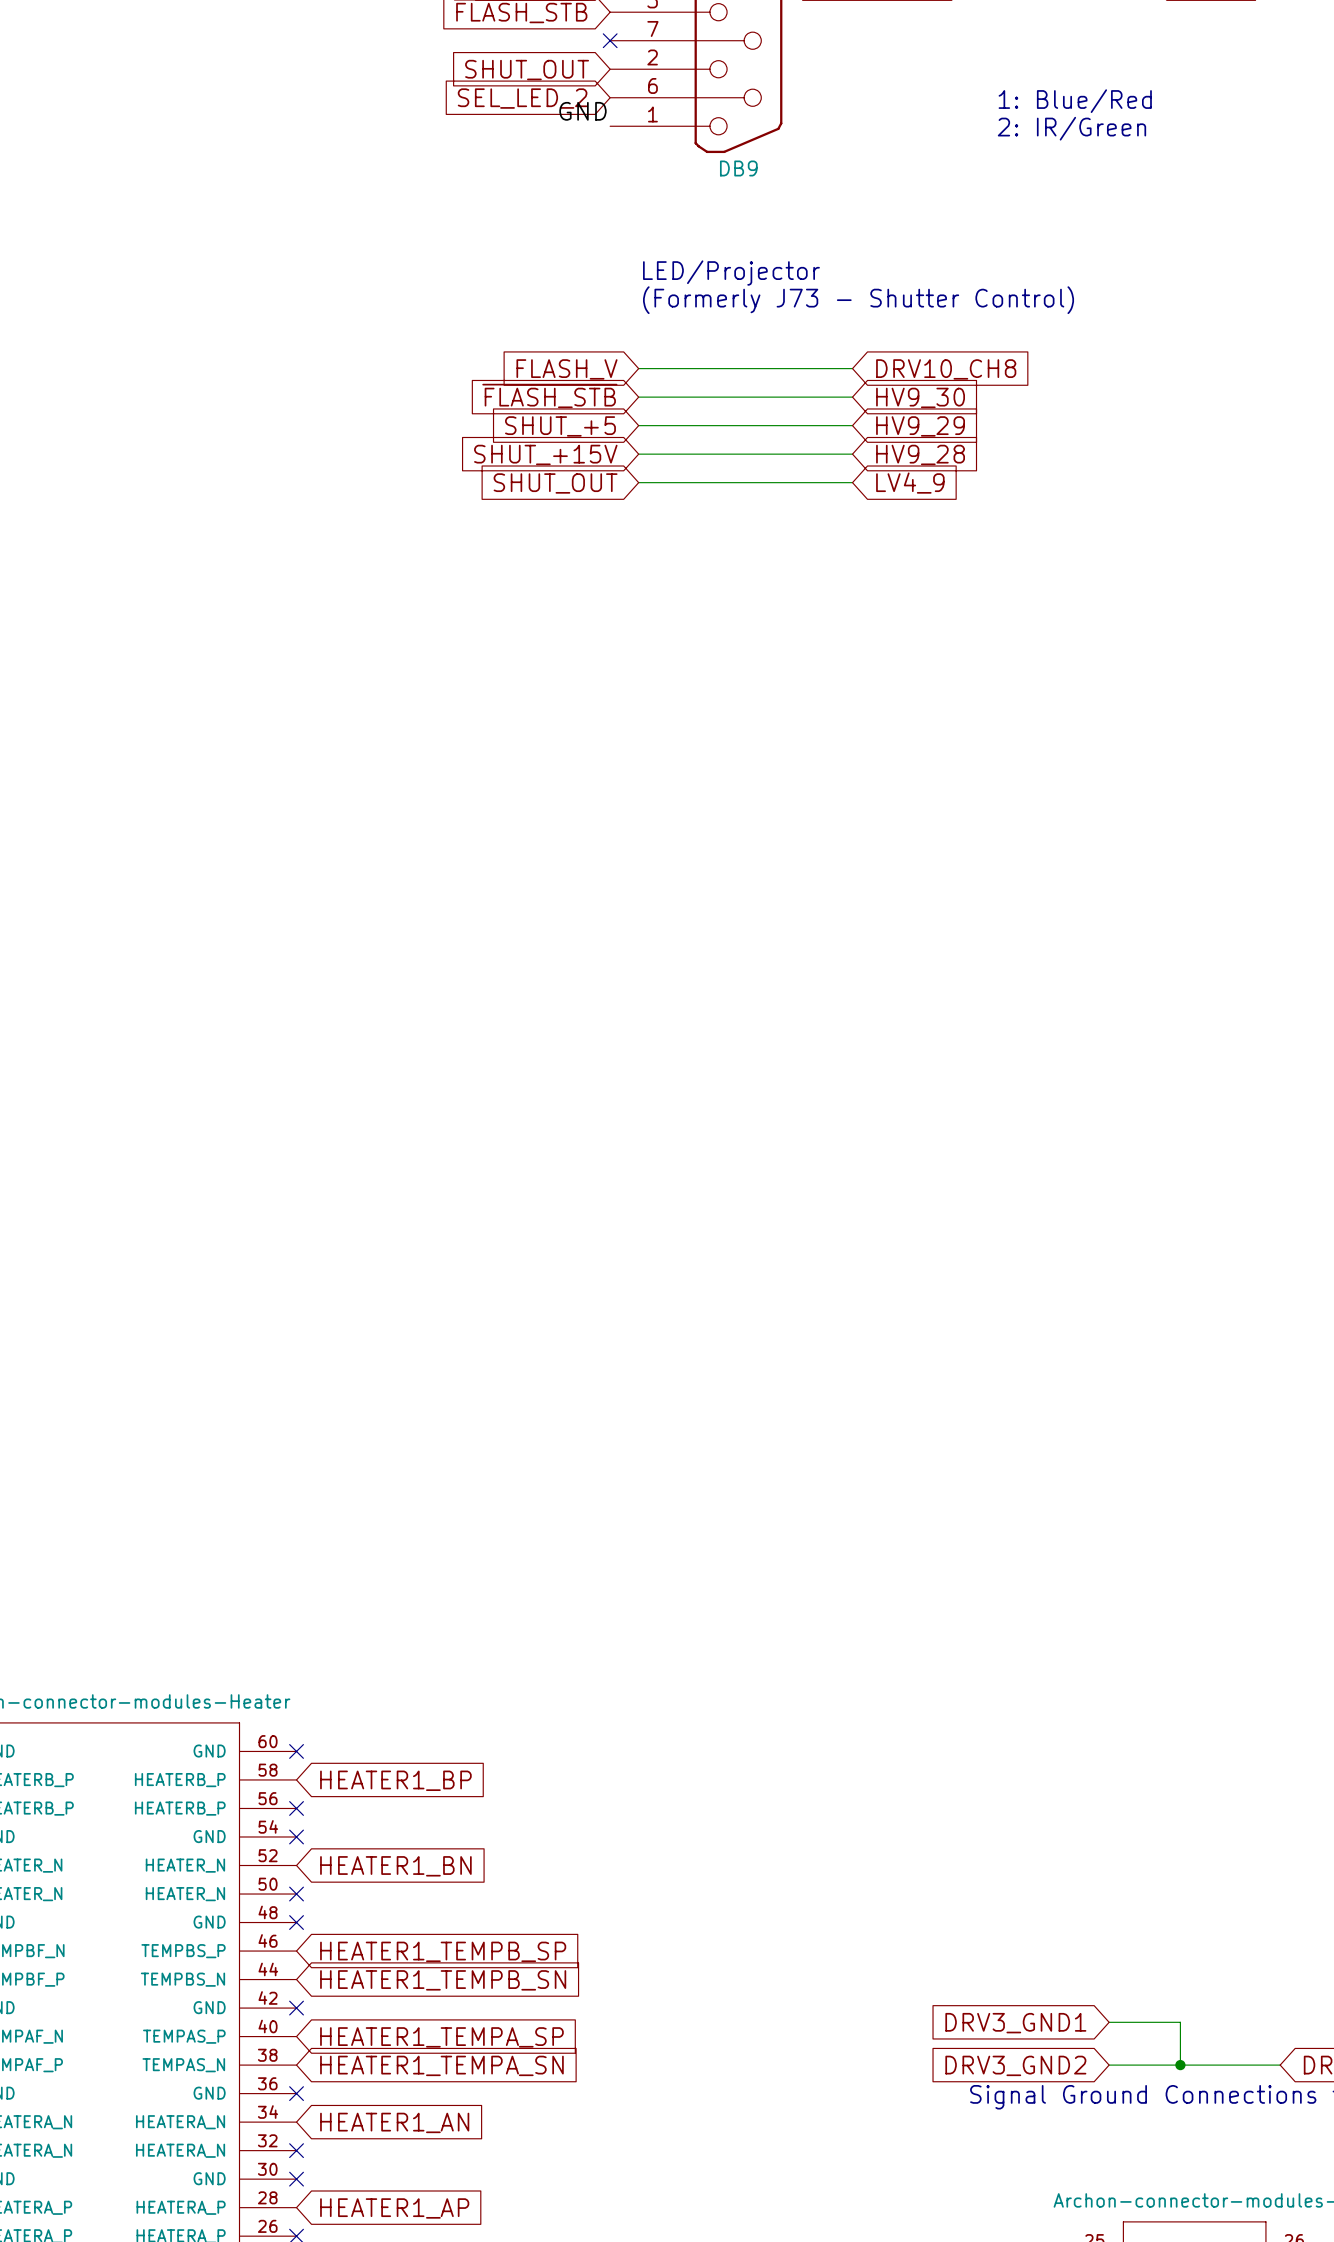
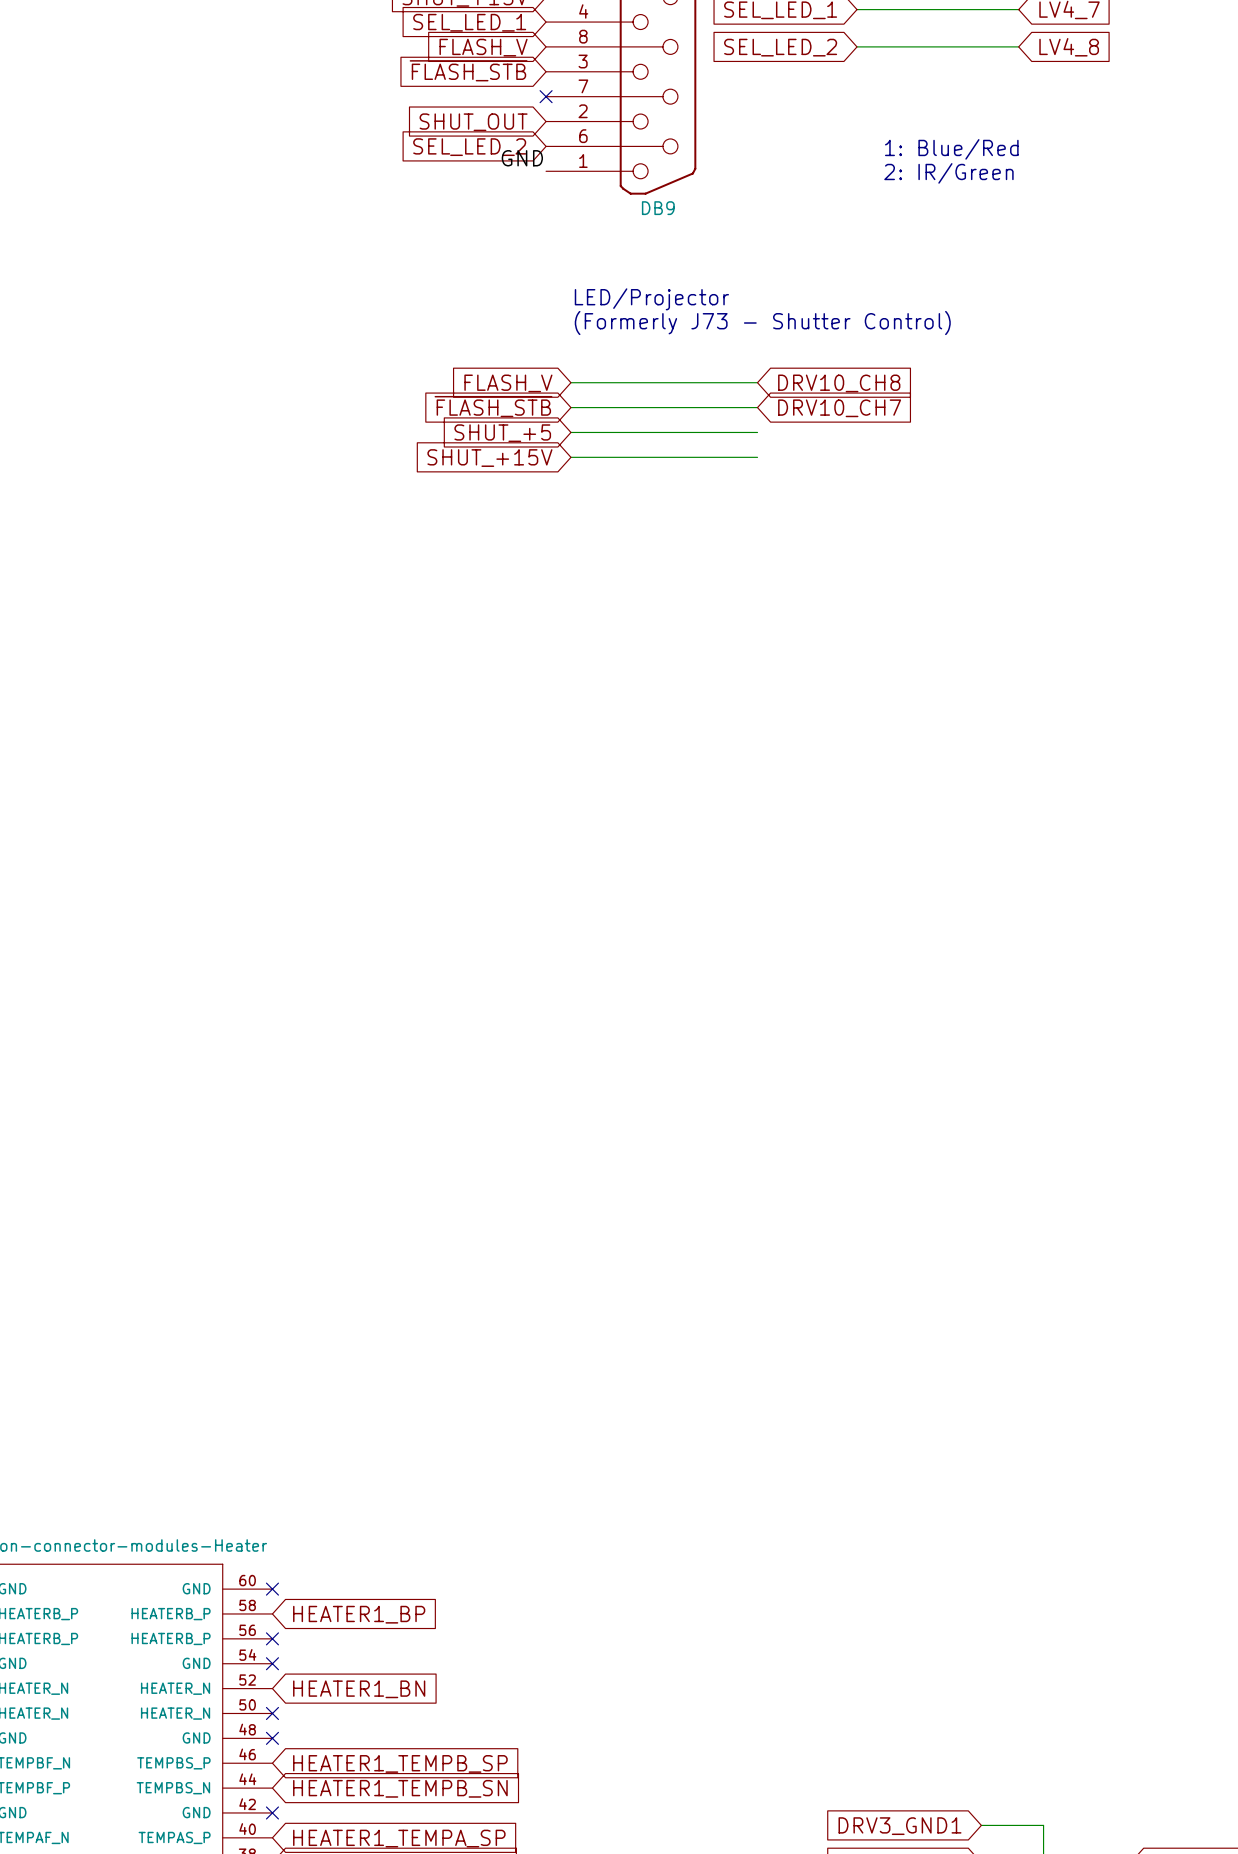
global label: HV9_30 (920, 397) -> DRV10_CH7 (839, 408)
global label: HV9_29 (920, 426) -> none
global label: HV9_28 (920, 454) -> none
wire: (638, 482) (852, 482) -> none
global label: SHUT_OUT (555, 483) -> none
global label: LV4_9 (910, 483) -> none

